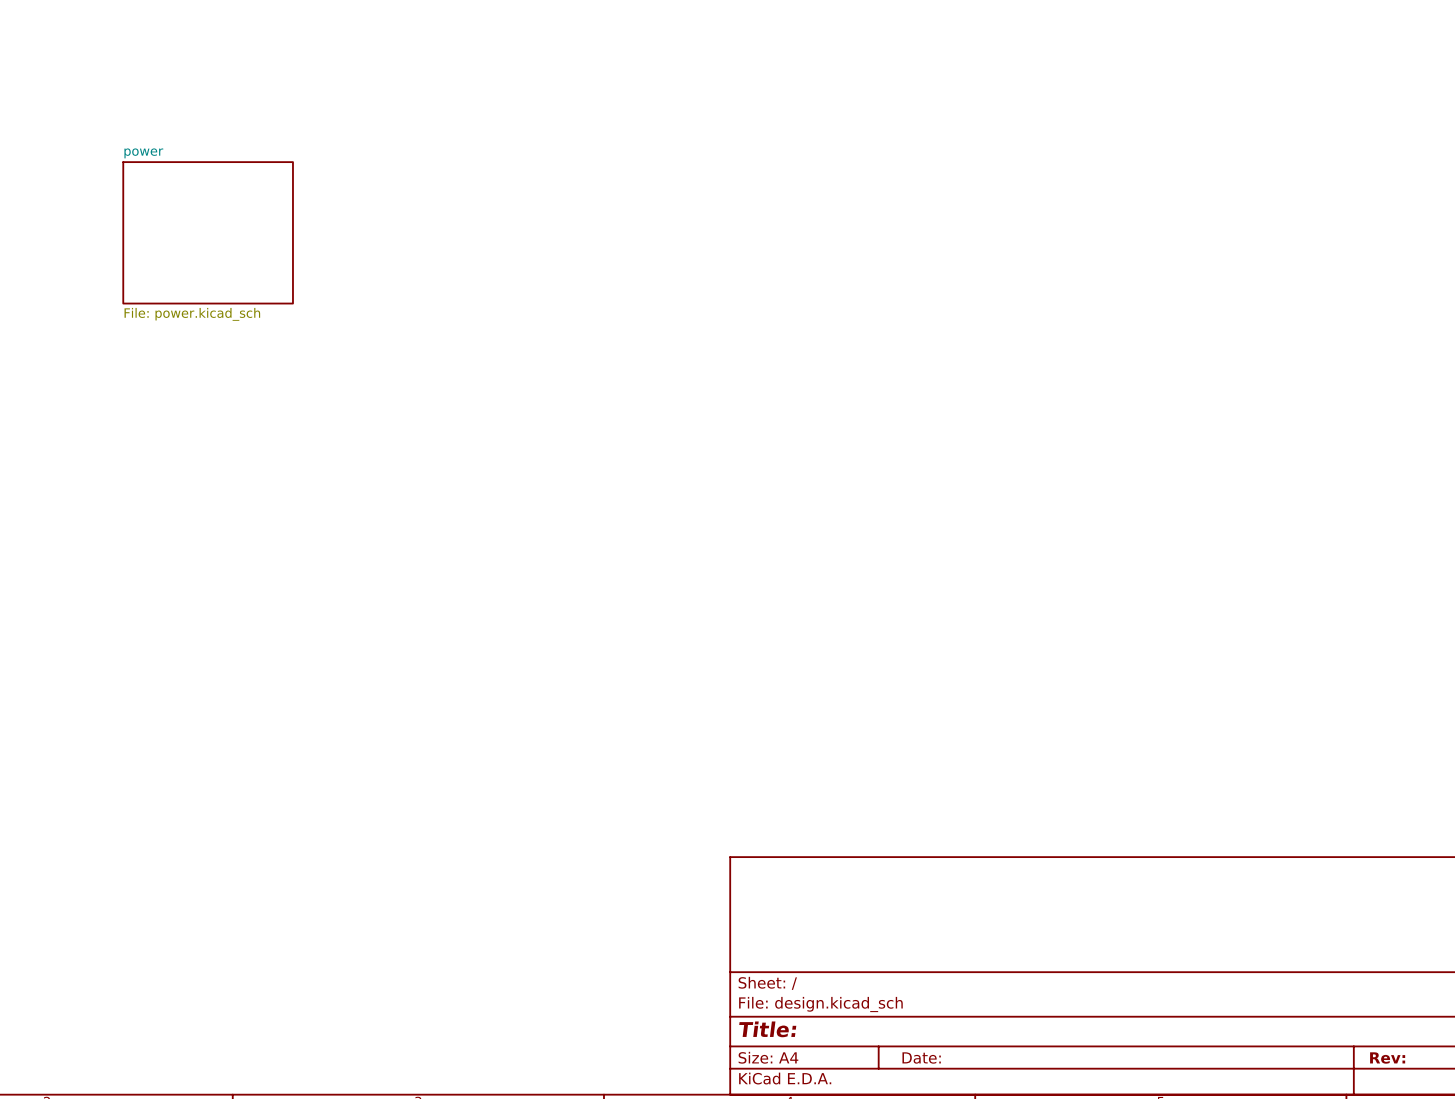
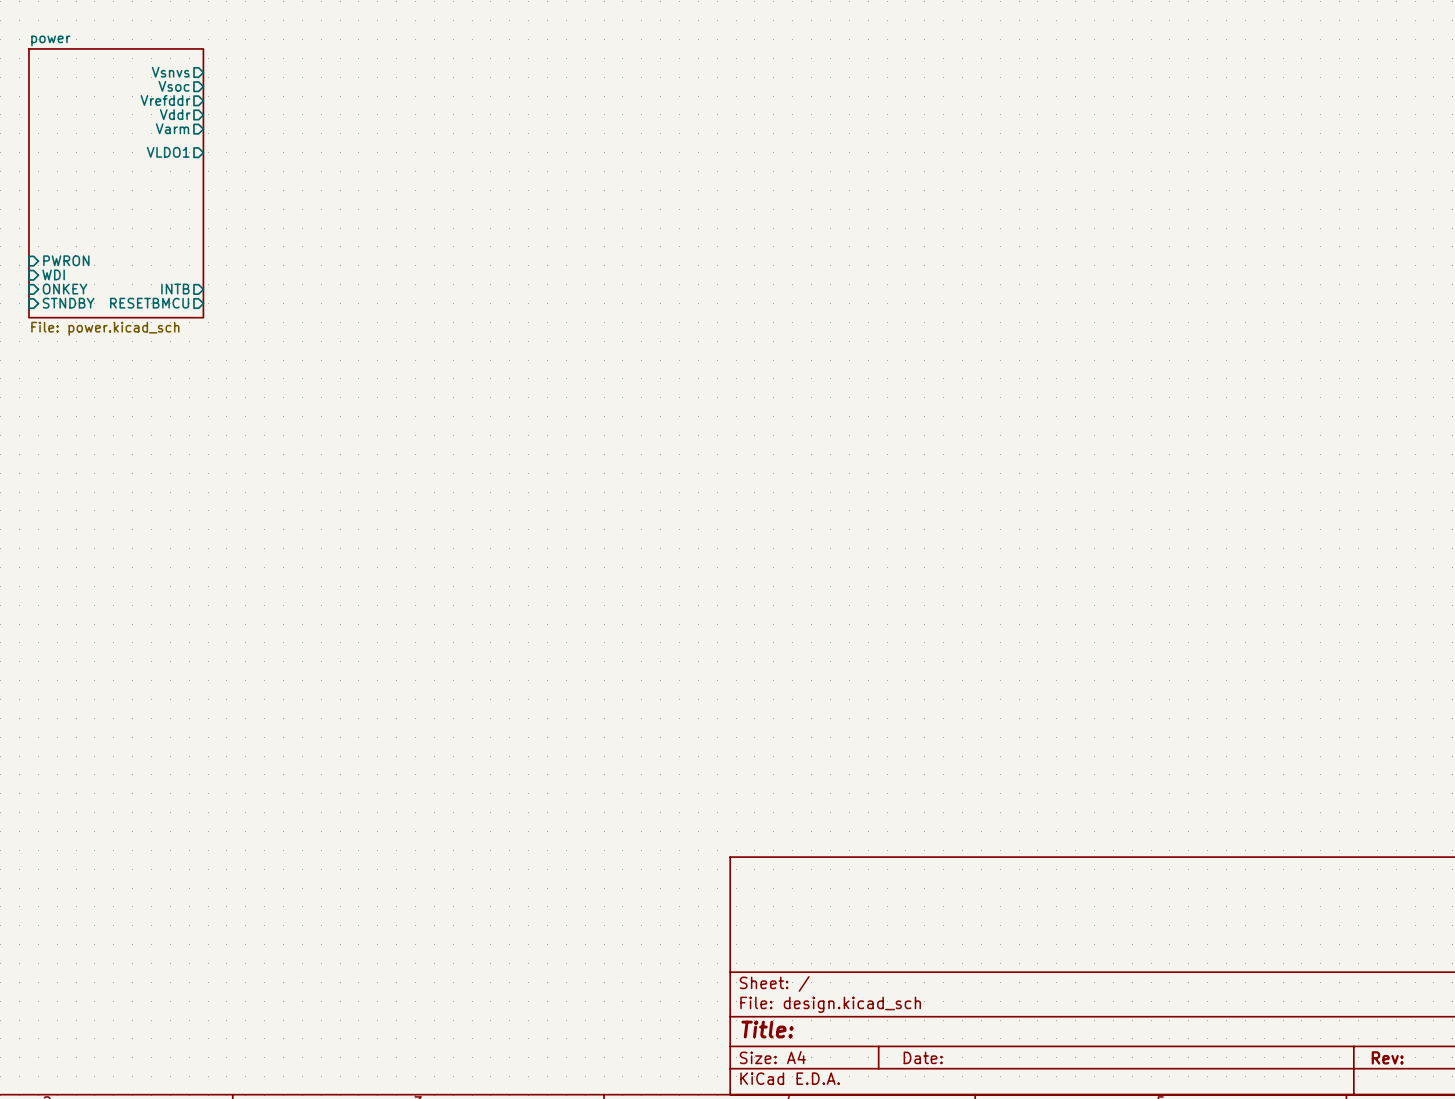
sheet pin: none -> Vsnvs (170, 72)
sheet pin: none -> Vsoc (174, 86)
sheet pin: none -> Vrefddr (165, 100)
sheet pin: none -> Vddr (175, 114)
sheet pin: none -> Varm (172, 128)
sheet pin: none -> VLDO1 (168, 152)
sheet power: none -> File: power.kicad_sch (116, 183)
sheet power: File: power.kicad_sch (208, 232) -> none
sheet pin: none -> PWRON (66, 260)
sheet pin: none -> WDI (53, 274)
sheet pin: none -> ONKEY (65, 289)
sheet pin: none -> INTB (175, 289)
sheet pin: none -> STNDBY (68, 303)
sheet pin: none -> RESETBMCU (149, 303)

